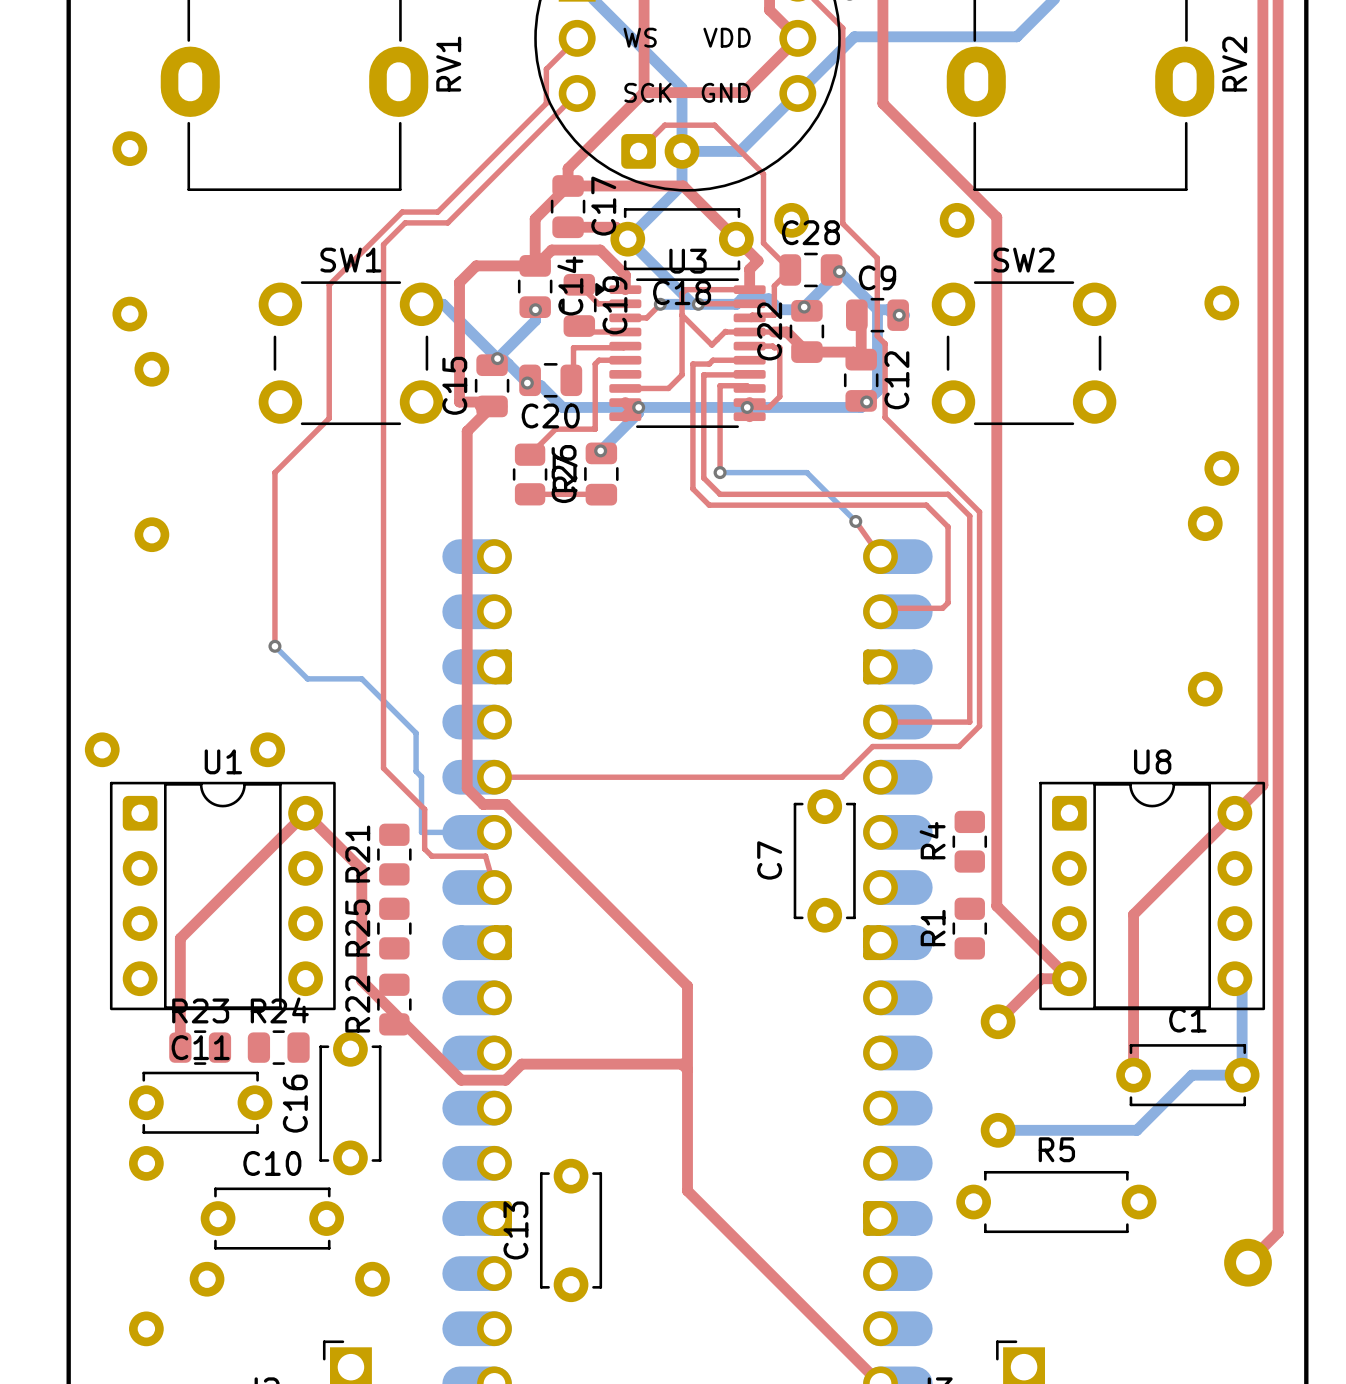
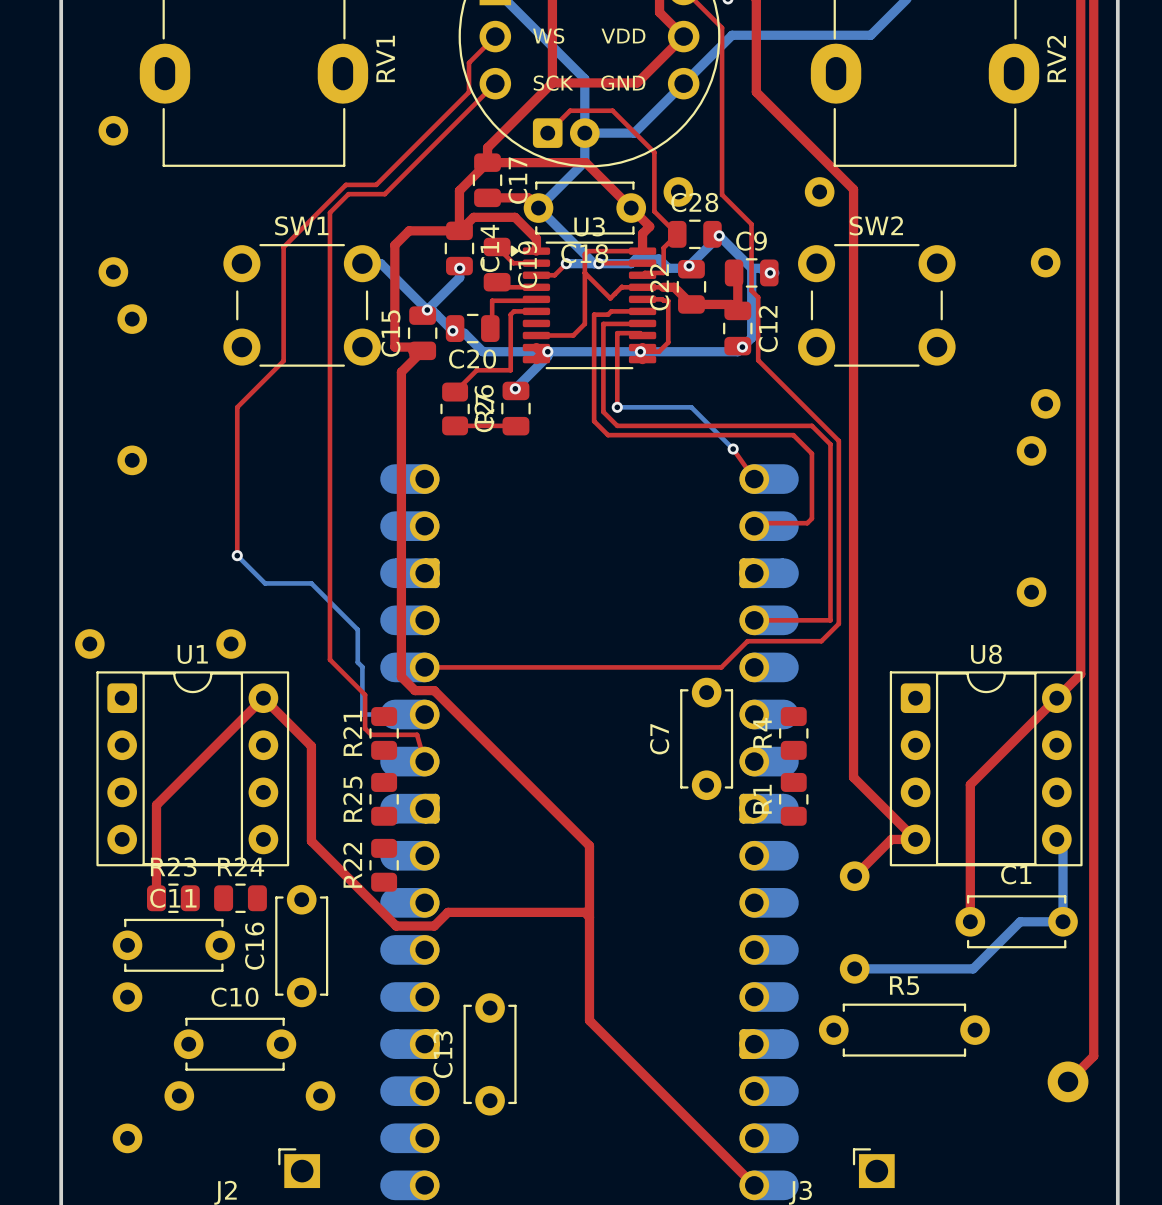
R4 position: (969, 841) -> (793, 733)
R21 position: (394, 854) -> (384, 733)
R25 position: (394, 928) -> (384, 799)
R1 position: (969, 928) -> (793, 799)
R22 position: (394, 1004) -> (384, 865)

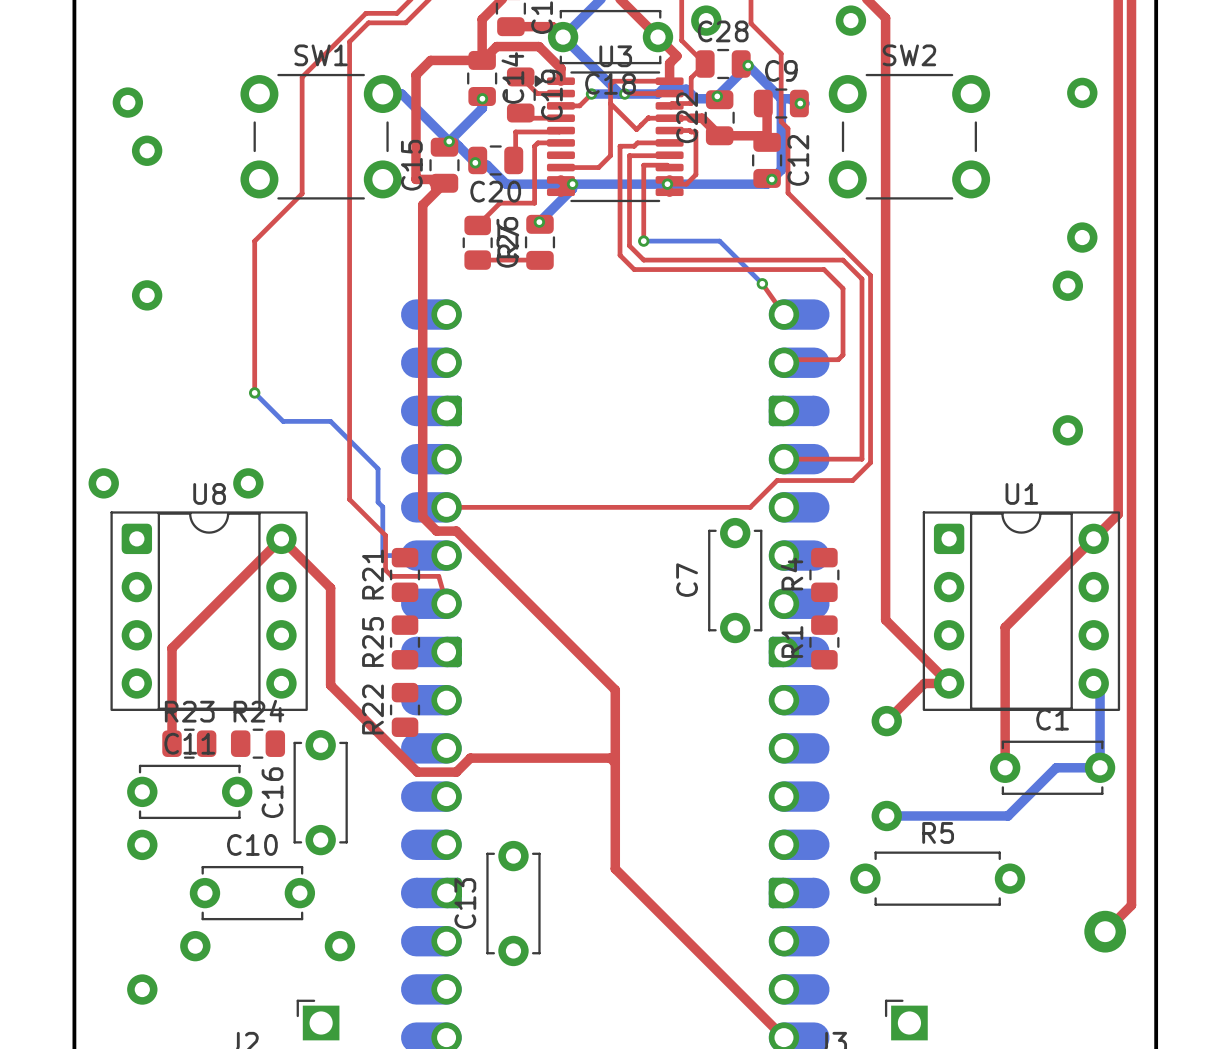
U1 name: U1 (192, 654) -> U8 (209, 493)
U8 name: U8 (986, 654) -> U1 (1021, 493)

